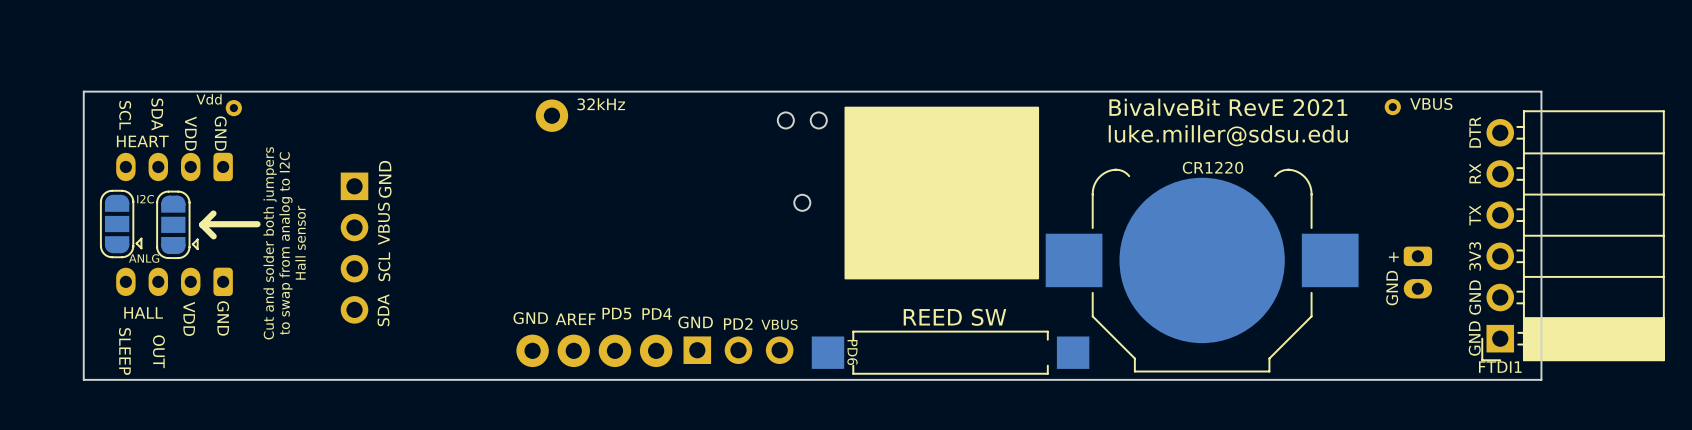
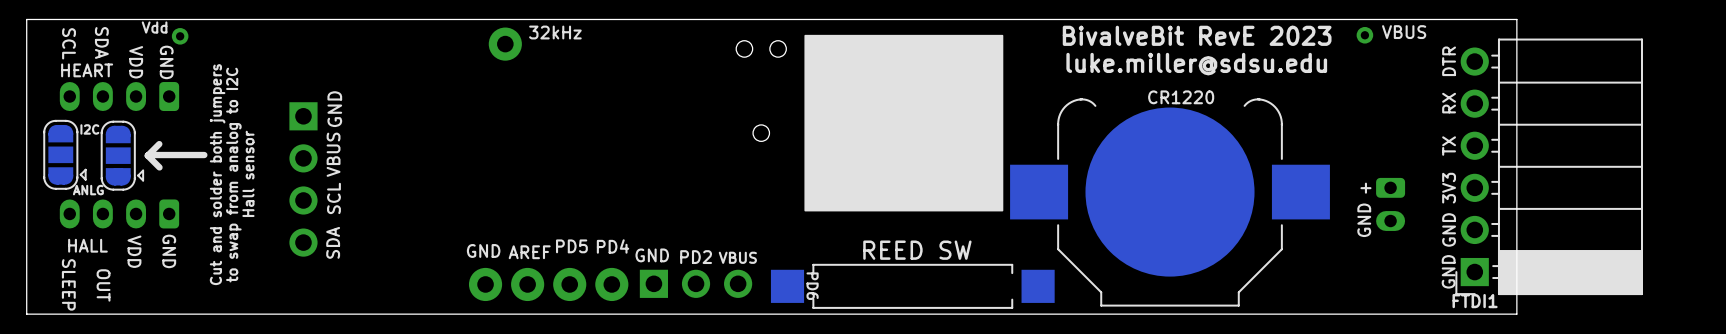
text: BivalveBit RevE 2021 (1228, 107) -> BivalveBit RevE 2023 (1197, 35)

